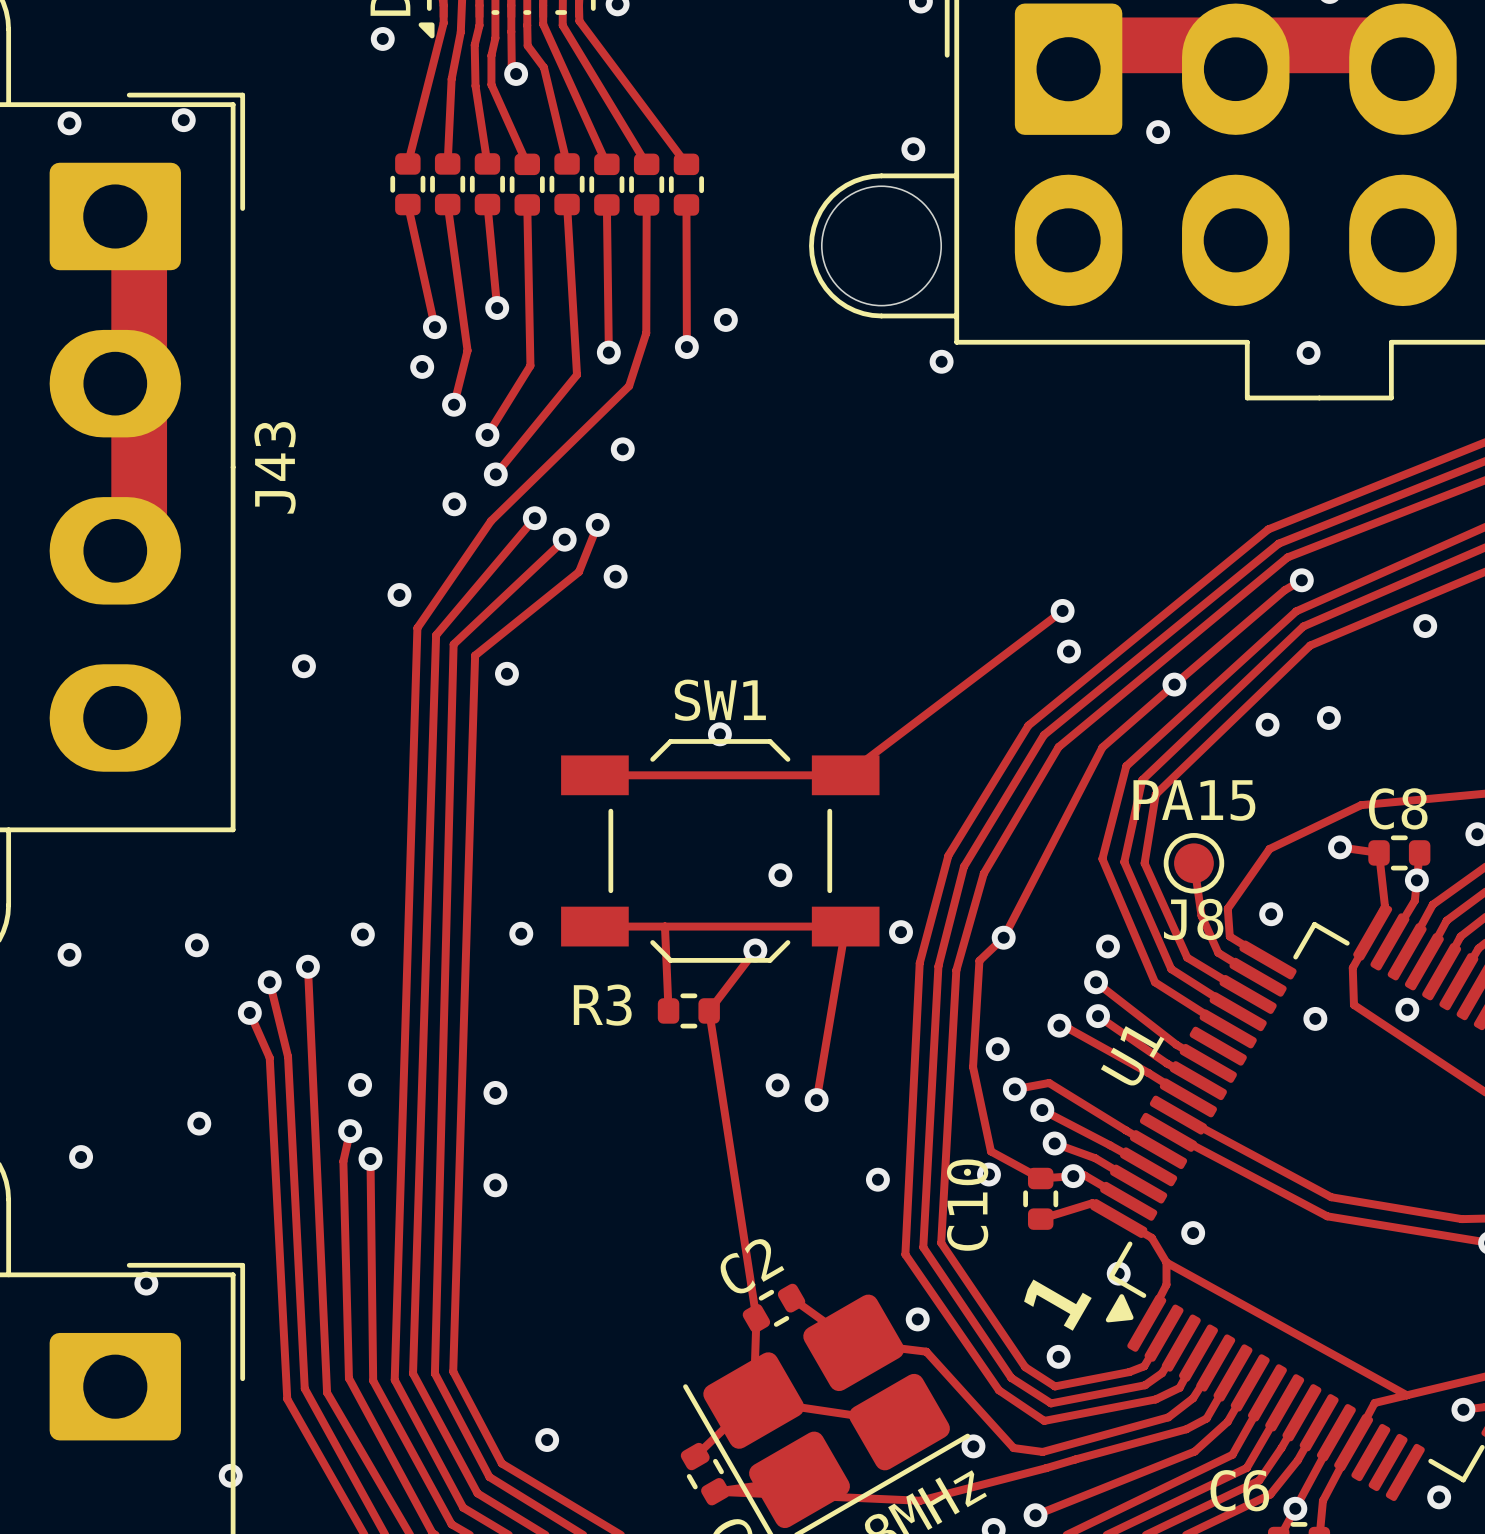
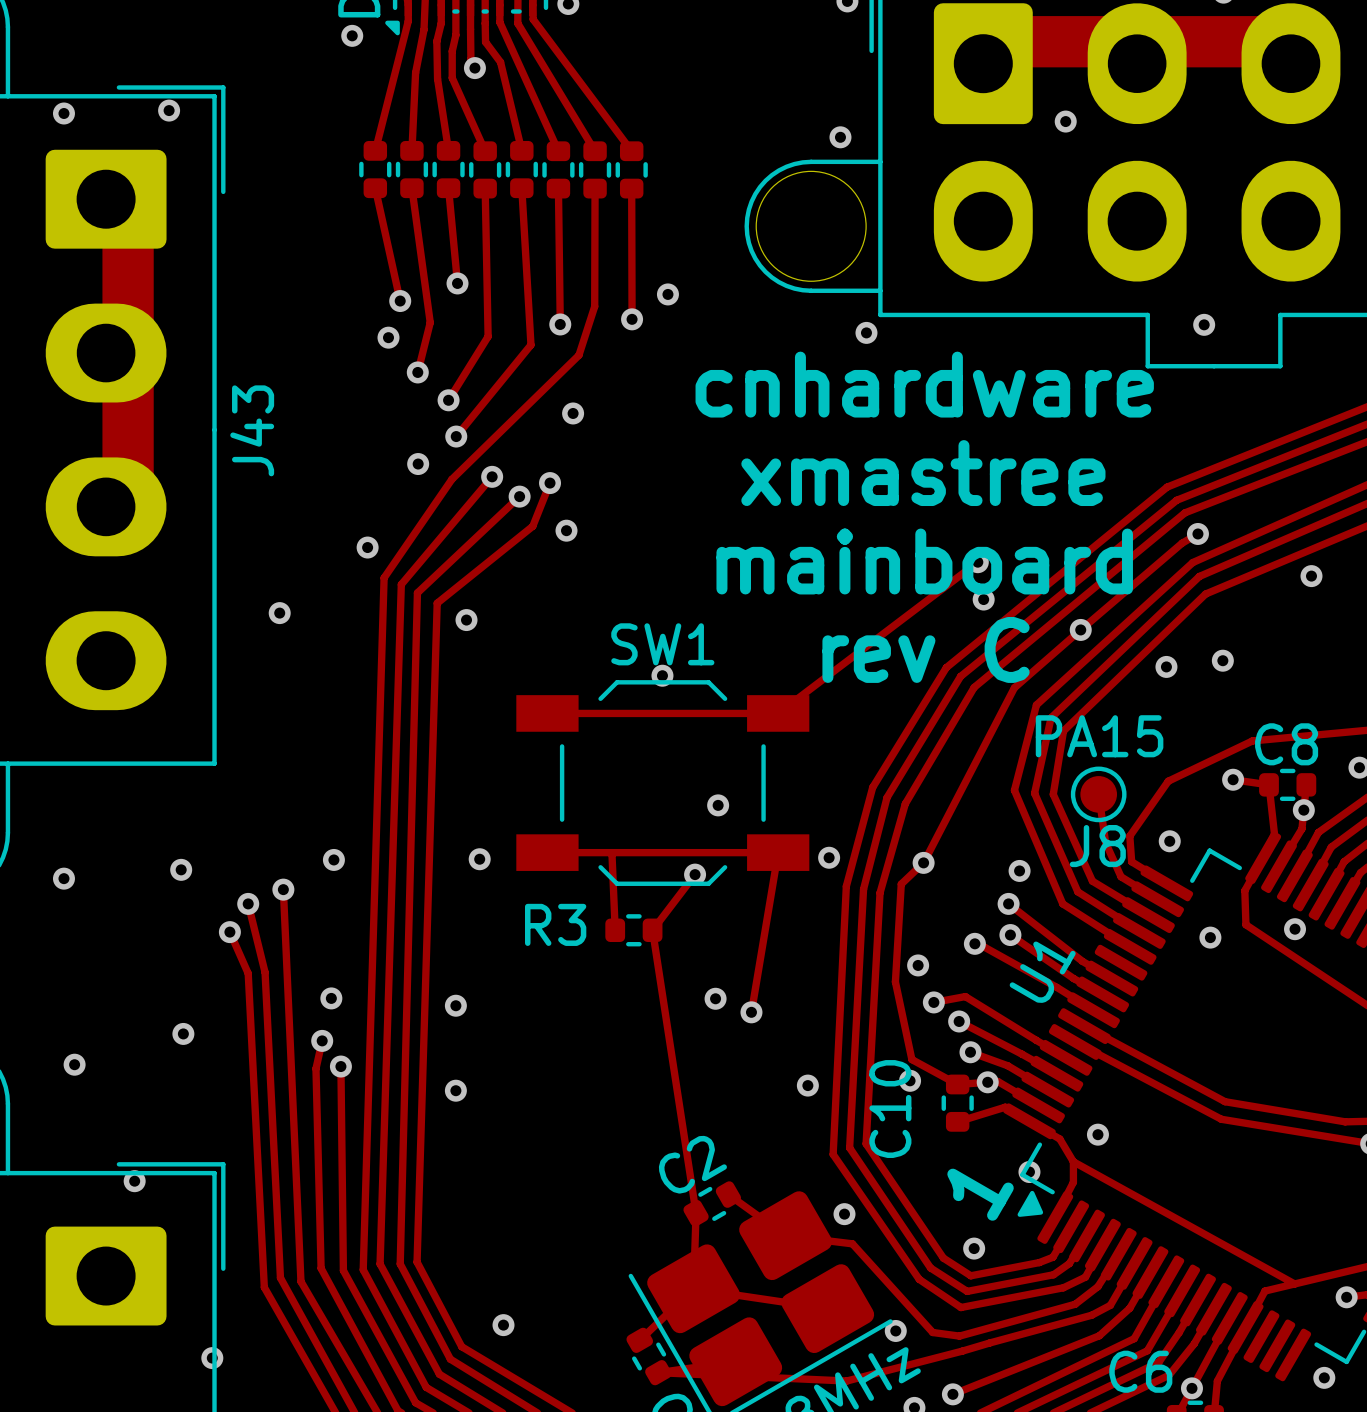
text: none -> cnhardware (924, 384)
text: none -> xmastree (923, 473)
text: none -> mainboard (924, 561)
text: none -> rev C (926, 649)

